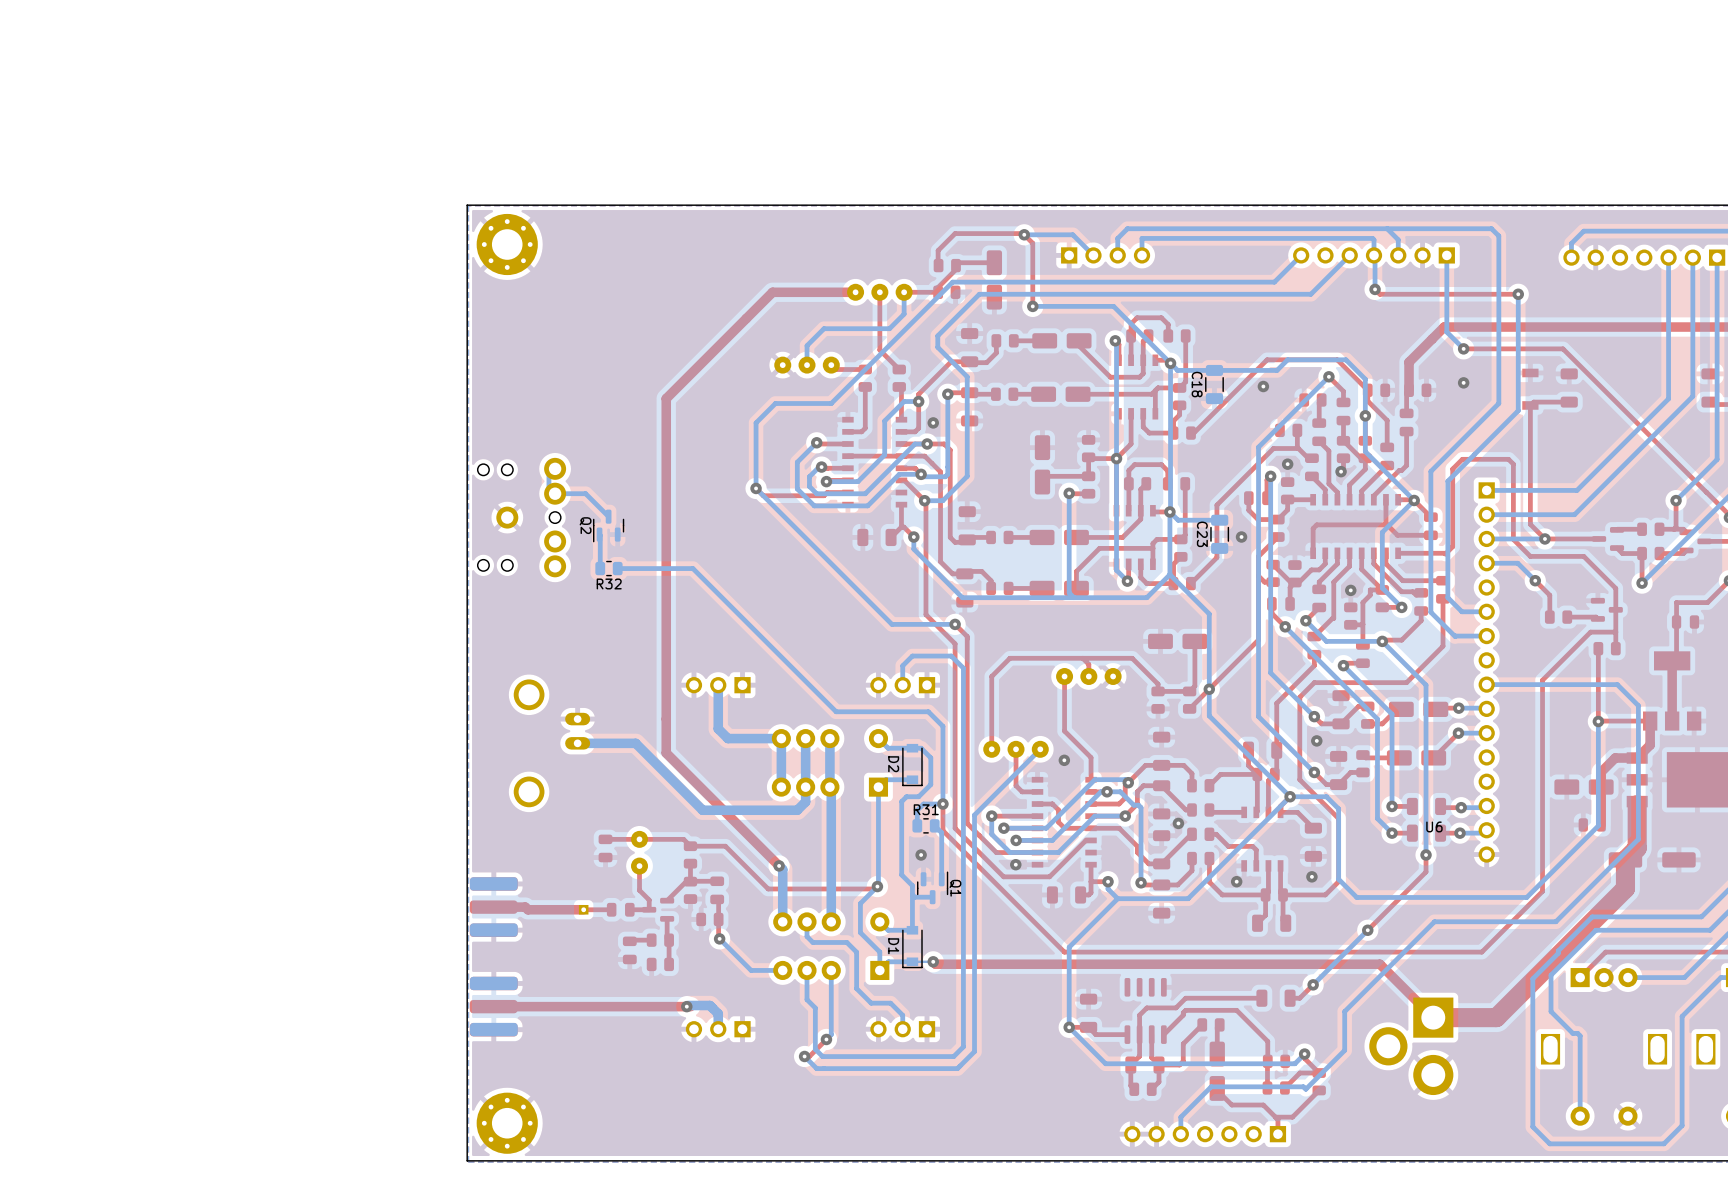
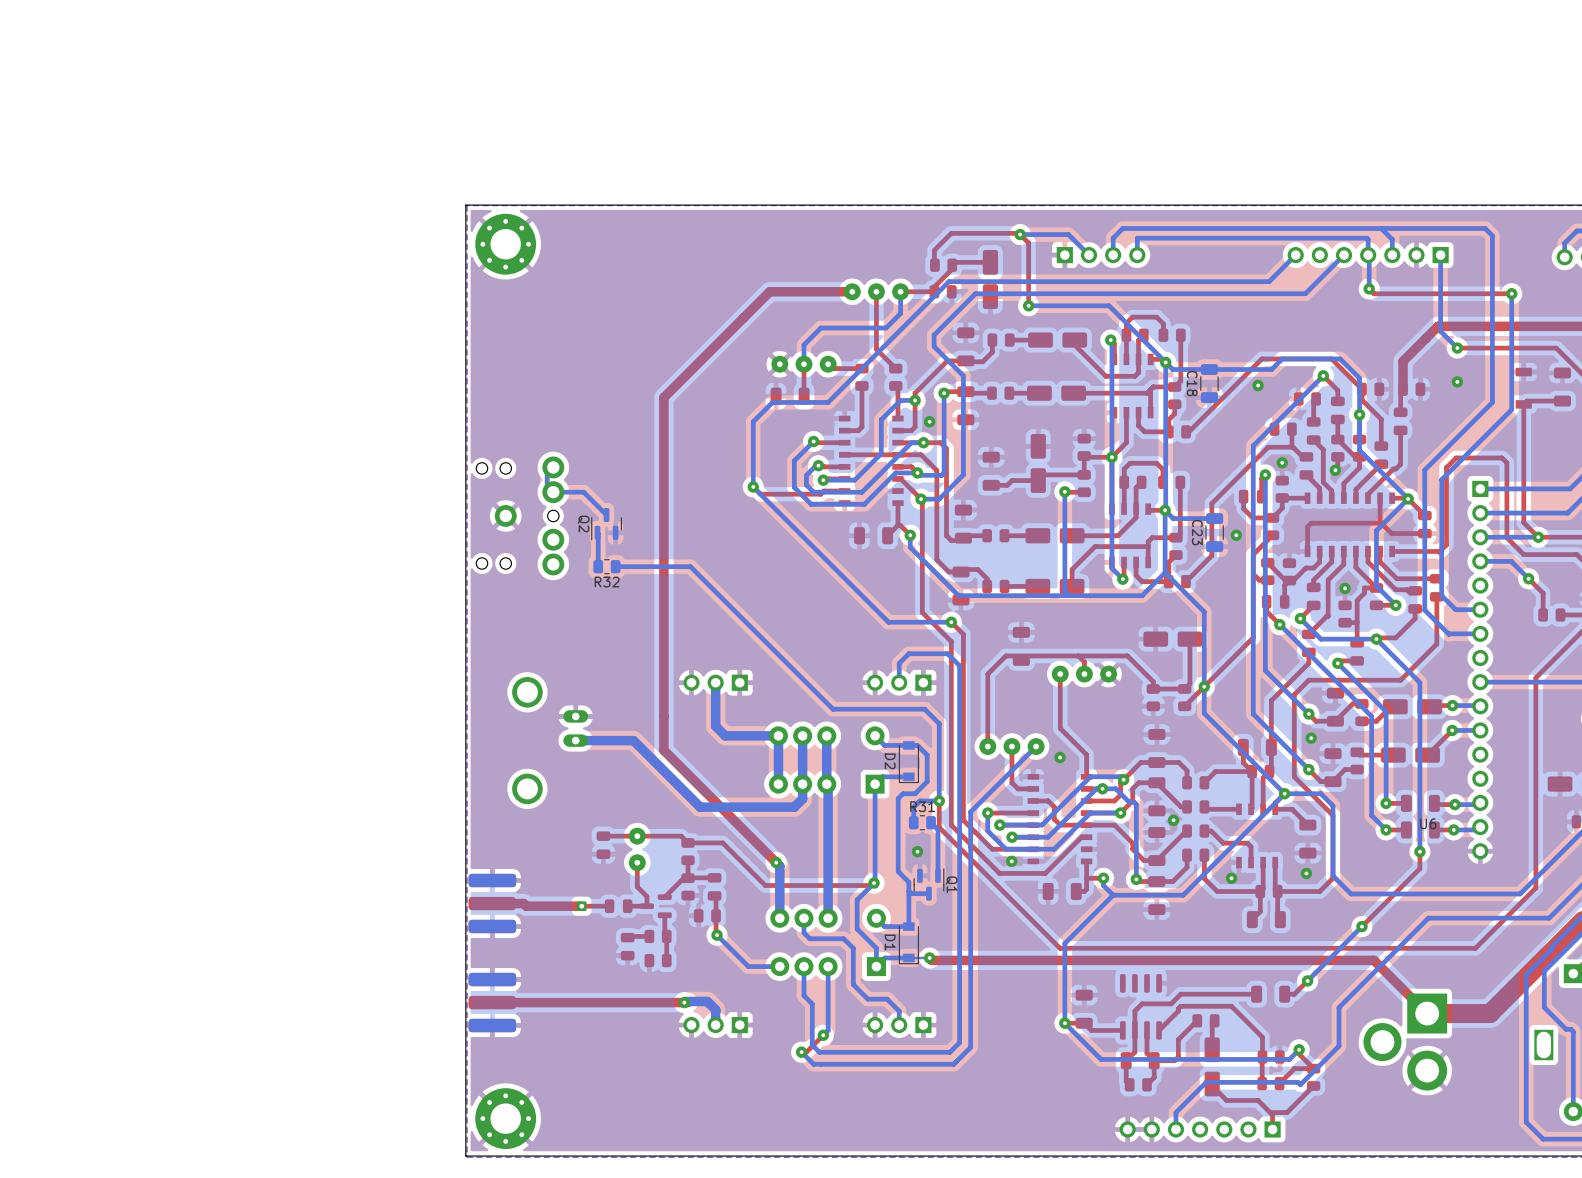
top track: none -> (803, 364) (803, 396)
part: none -> (790, 396)
part: none -> (991, 471)
top track: none -> (1038, 480) (1012, 480) (1007, 485) (991, 485)
part: none -> (1021, 646)

